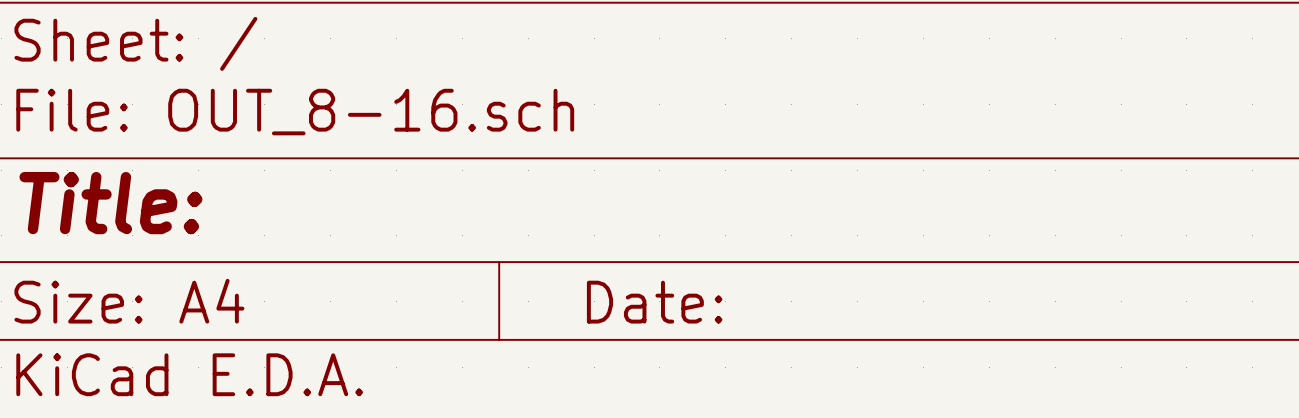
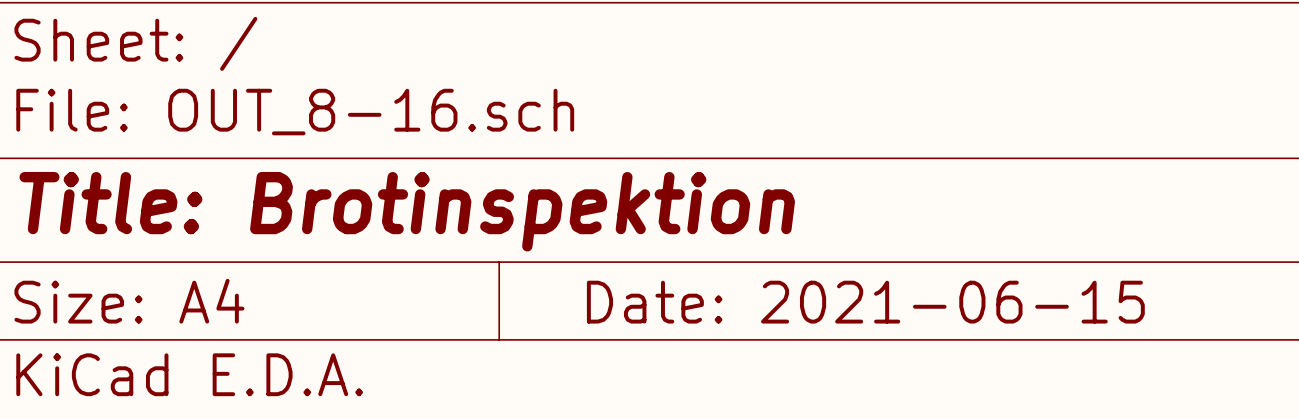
title block: Title: (110, 203) -> Title: Brotinspektion (407, 211)
title block: Date: (654, 302) -> Date: 2021-06-15 (865, 302)

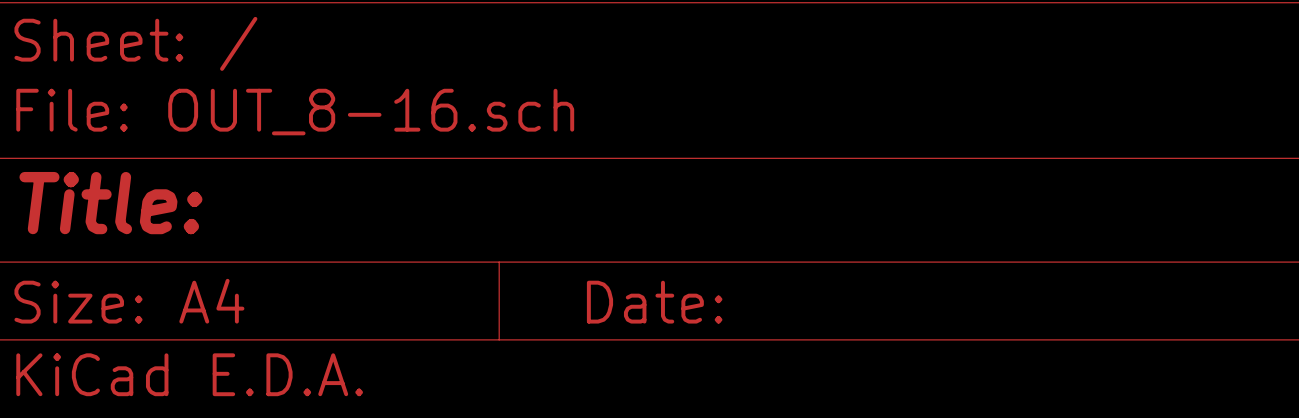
title block: Title: Brotinspektion (407, 211) -> Title: (110, 203)
title block: Date: 2021-06-15 (865, 302) -> Date: (654, 302)

